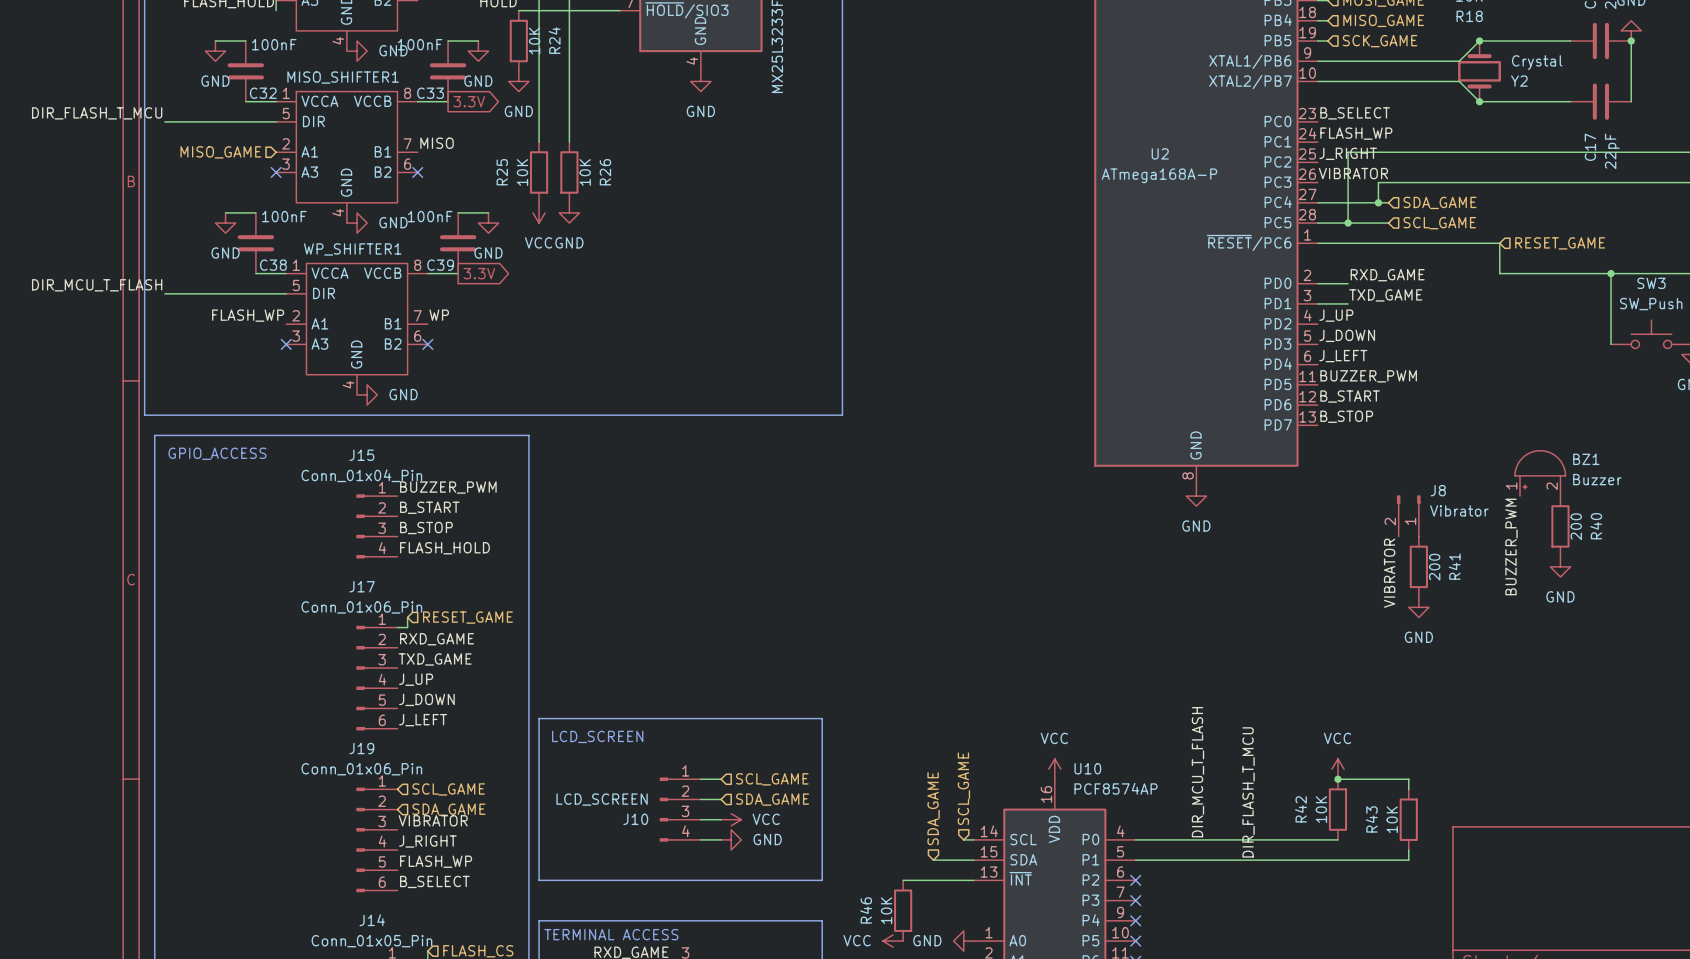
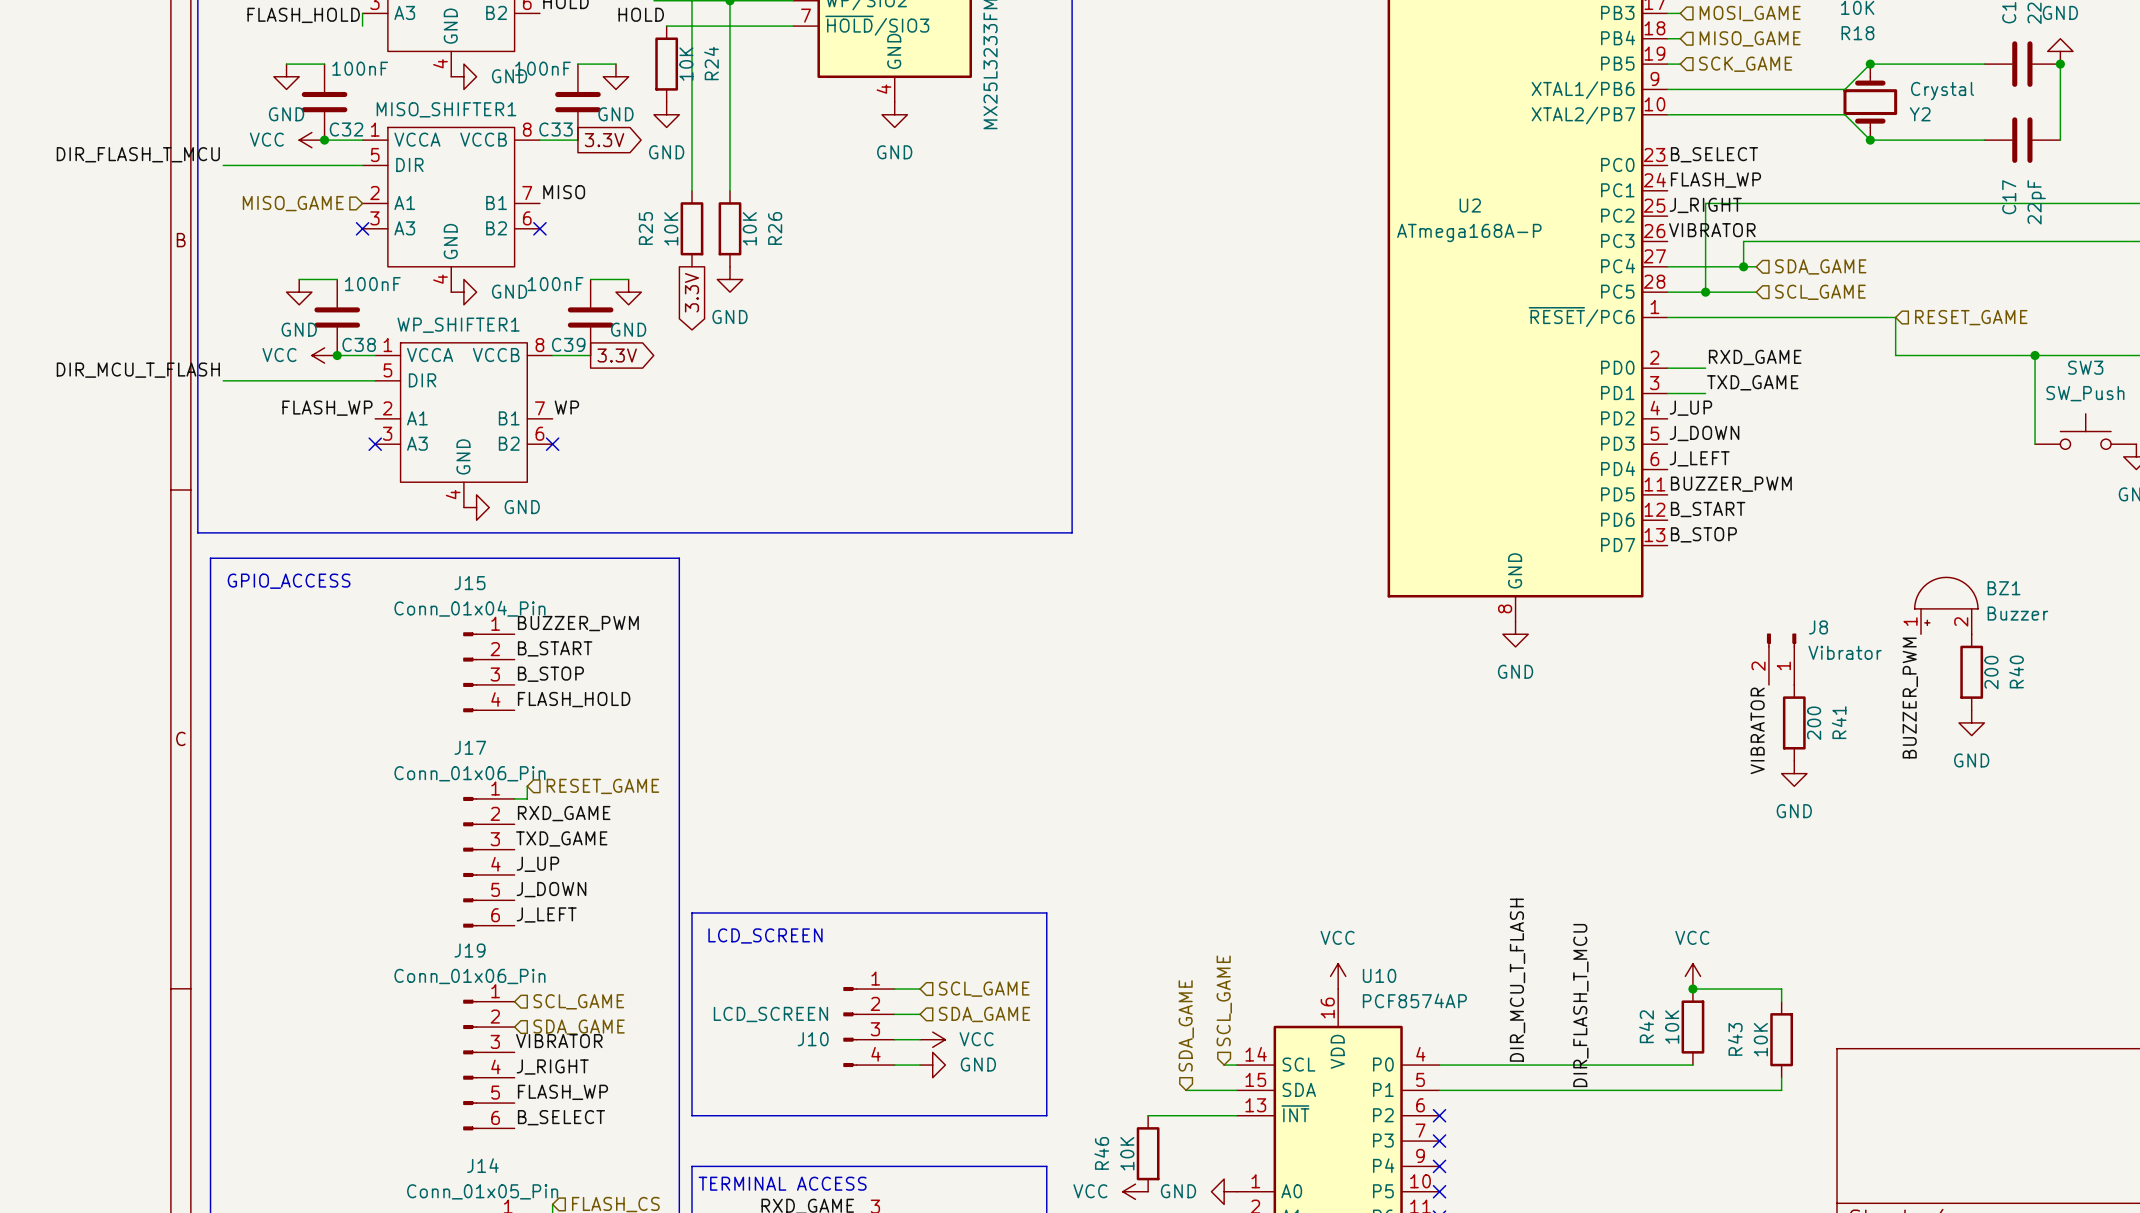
power symbol: none -> VCC (311, 140)
junction: none -> (324, 140)
power symbol: VCC (539, 212) -> none
global label: none -> 3.3V (691, 292)
power symbol: none -> VCC (324, 355)
junction: none -> (337, 355)

